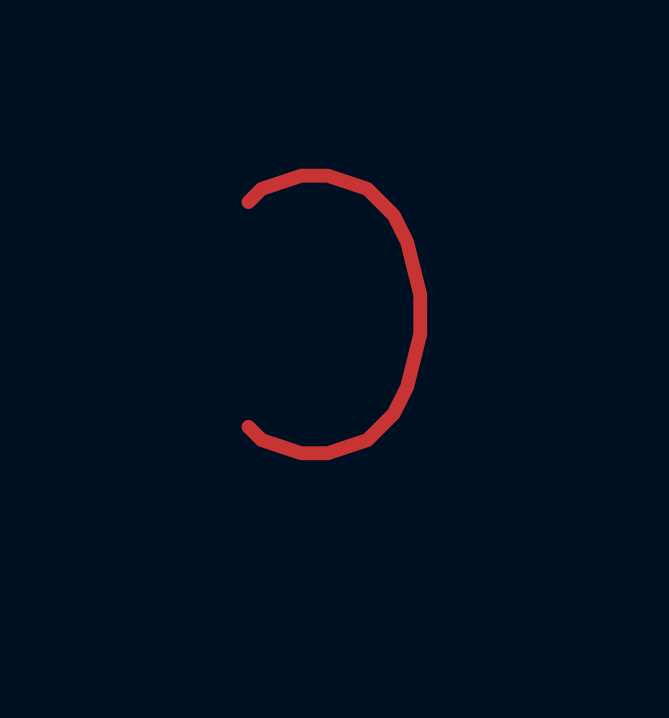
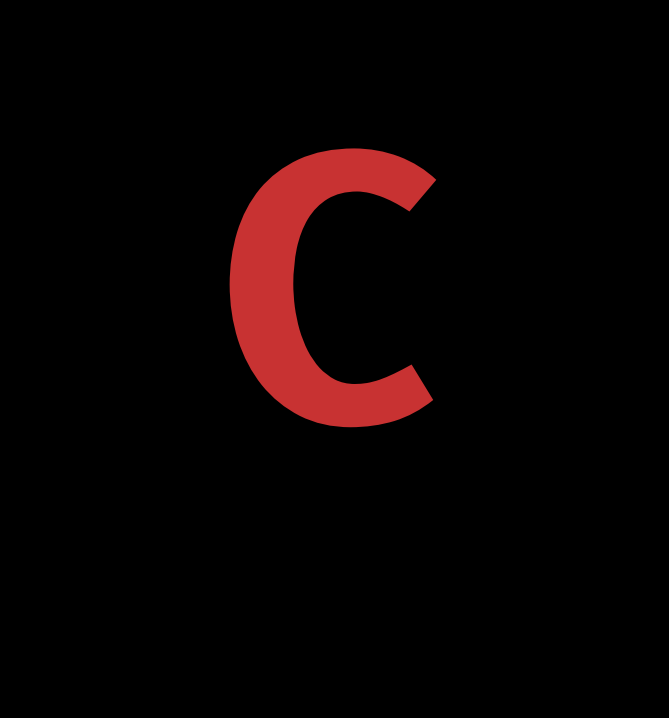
text rotation: 0° (334, 314) -> 180° (332, 287)

